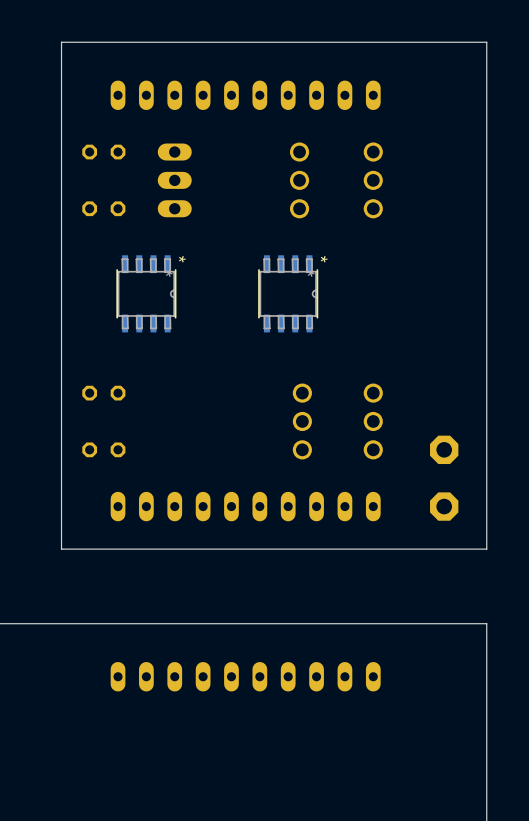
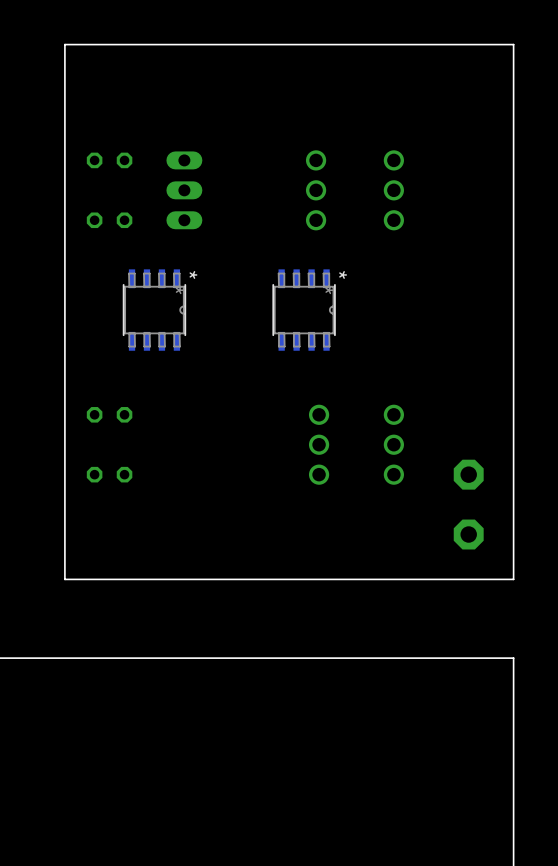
part: (245, 95) -> none
part: (245, 506) -> none
part: (245, 676) -> none

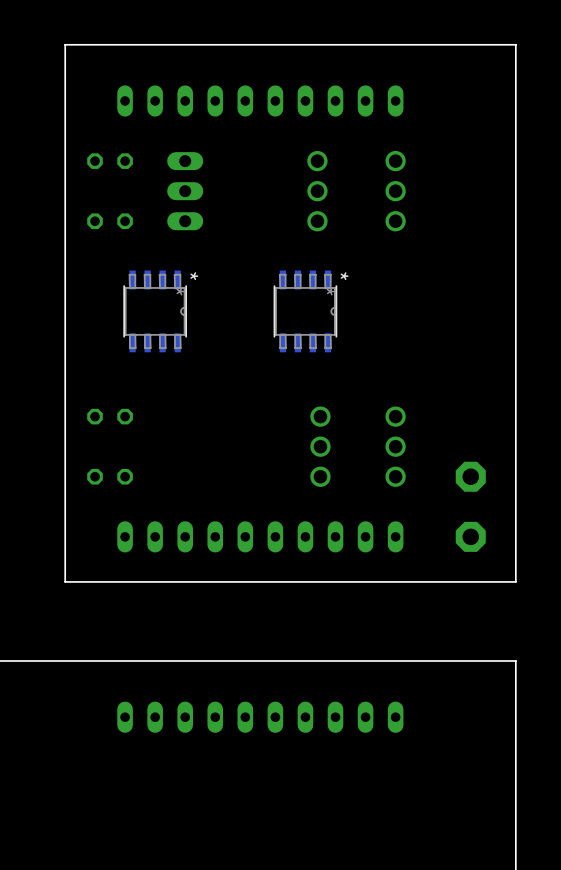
part: none -> (260, 100)
part: none -> (260, 536)
part: none -> (260, 717)

